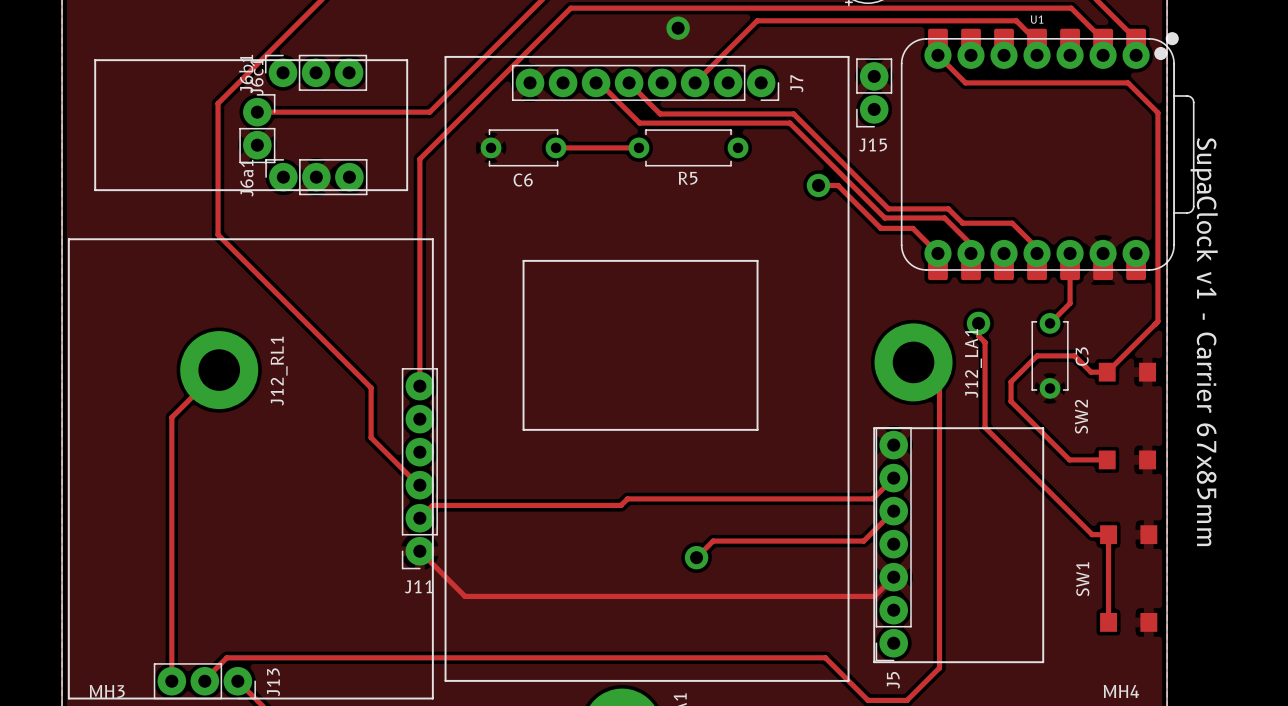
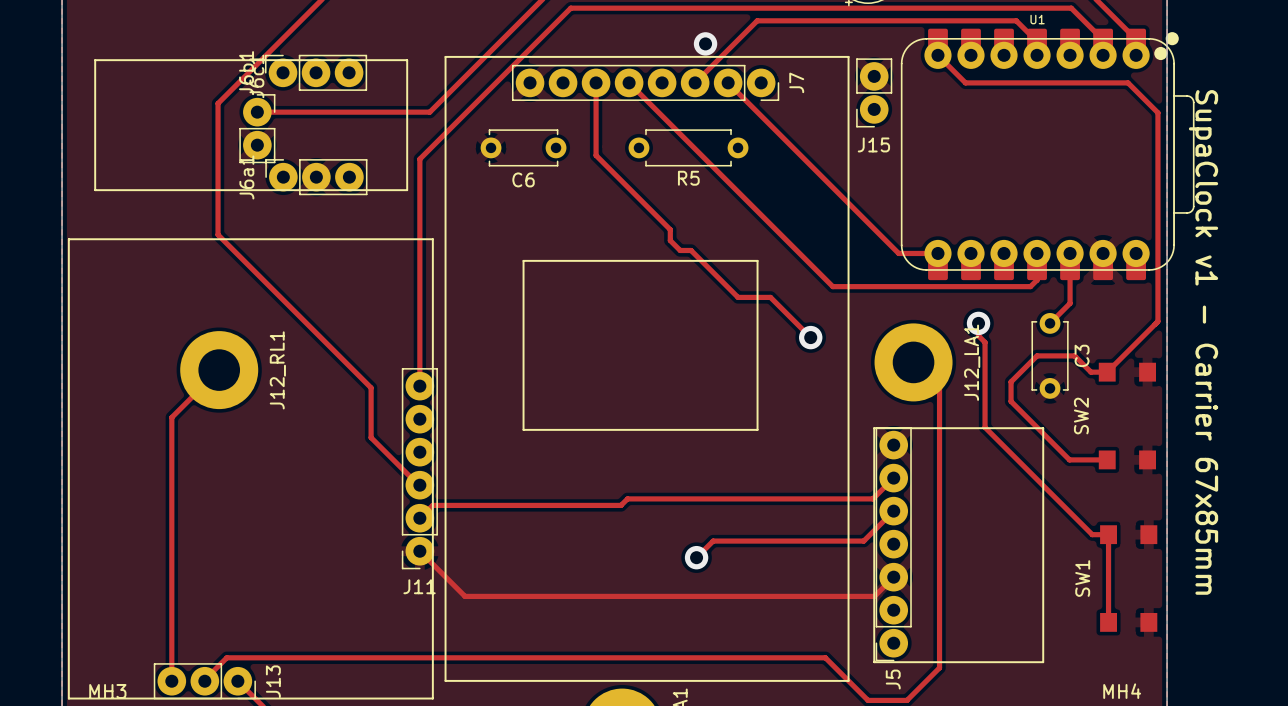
via position: (678, 28) -> (705, 43)
track: (596, 82) (599, 82) (639, 123) (789, 123) (884, 217) (944, 217) (971, 244) (971, 253) (968, 253) -> (596, 82) (596, 155) (670, 229) (670, 240) (680, 250) (691, 250) (738, 297) (770, 297) (810, 337)
track: (660, 113) (793, 113) (888, 208) (948, 208) (962, 223) (1012, 223) (1037, 248) (1037, 253) -> (660, 113) (832, 286) (1030, 286) (1037, 280) (1037, 264)
track: (556, 147) (638, 147) -> none
track: (818, 185) (838, 185) (880, 228) (912, 228) (937, 253) -> (728, 82) (898, 253) (937, 253)
via: (818, 185) -> none
via: none -> (810, 337)

